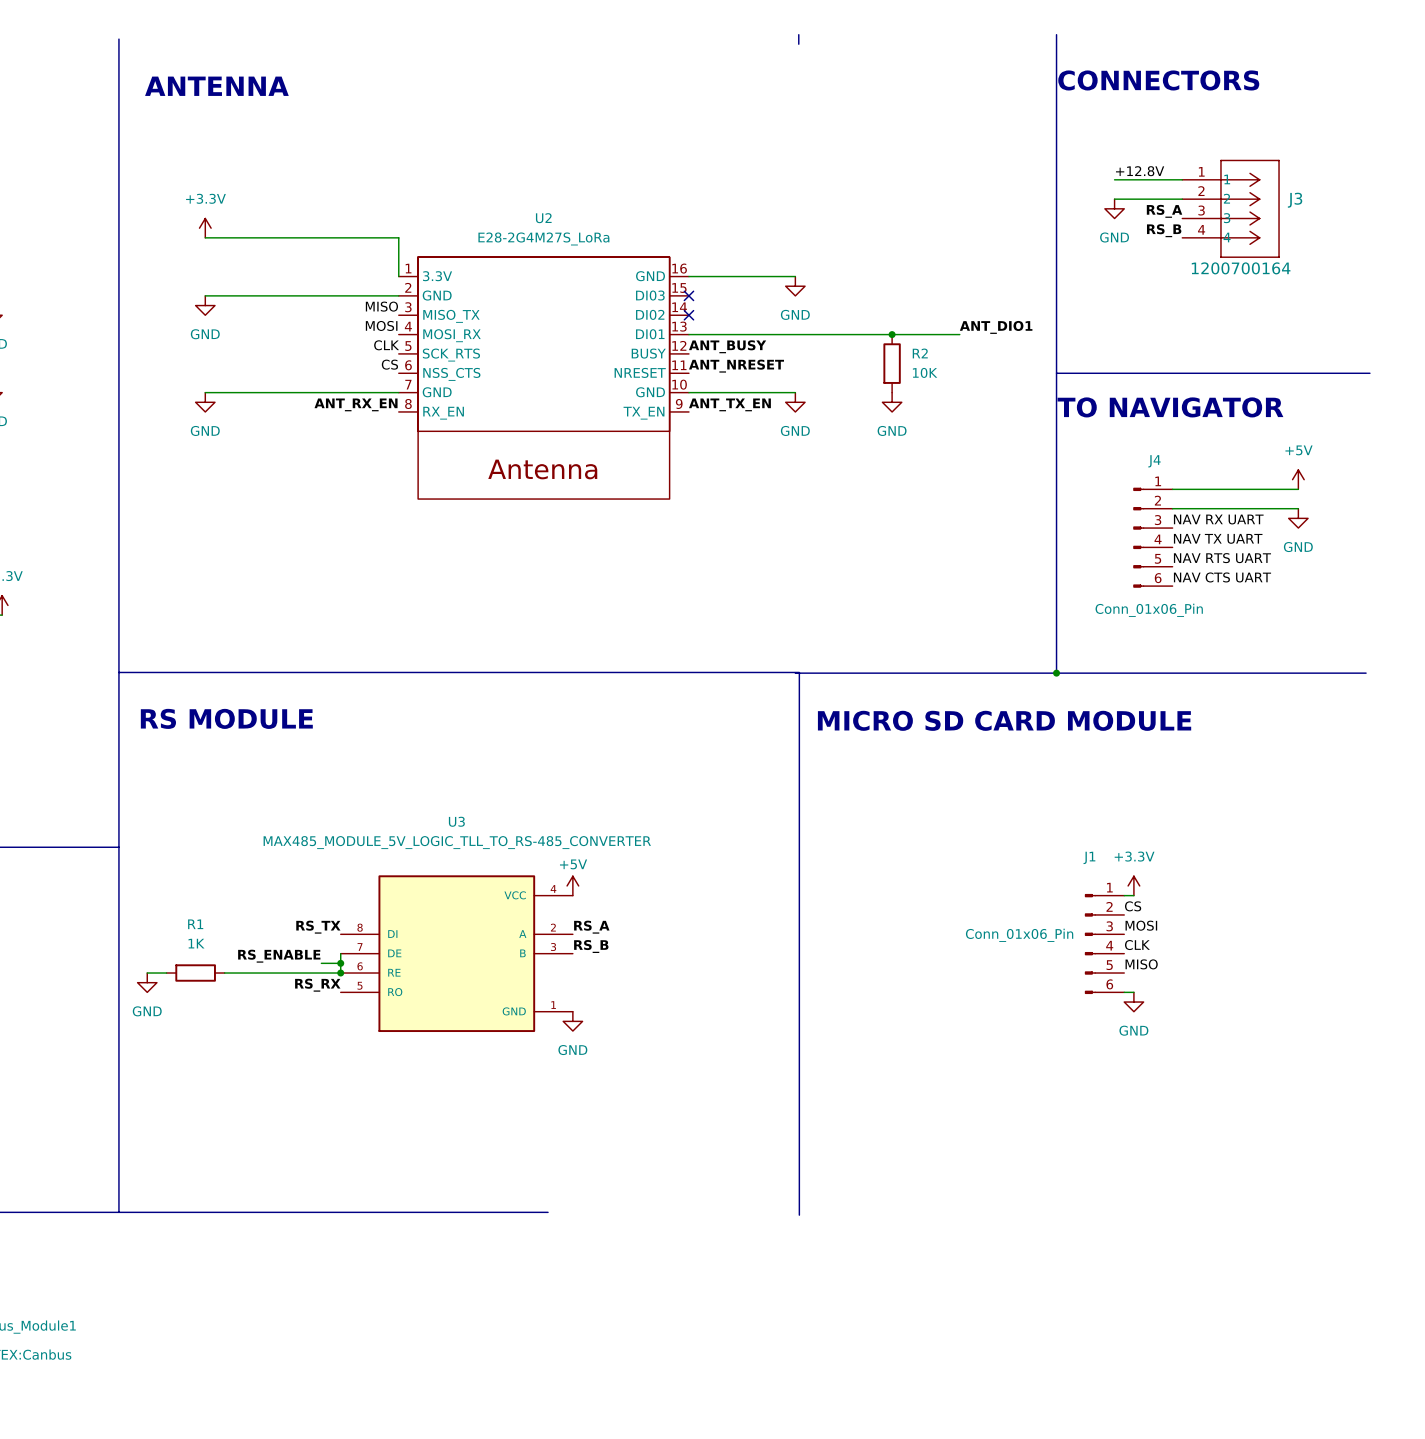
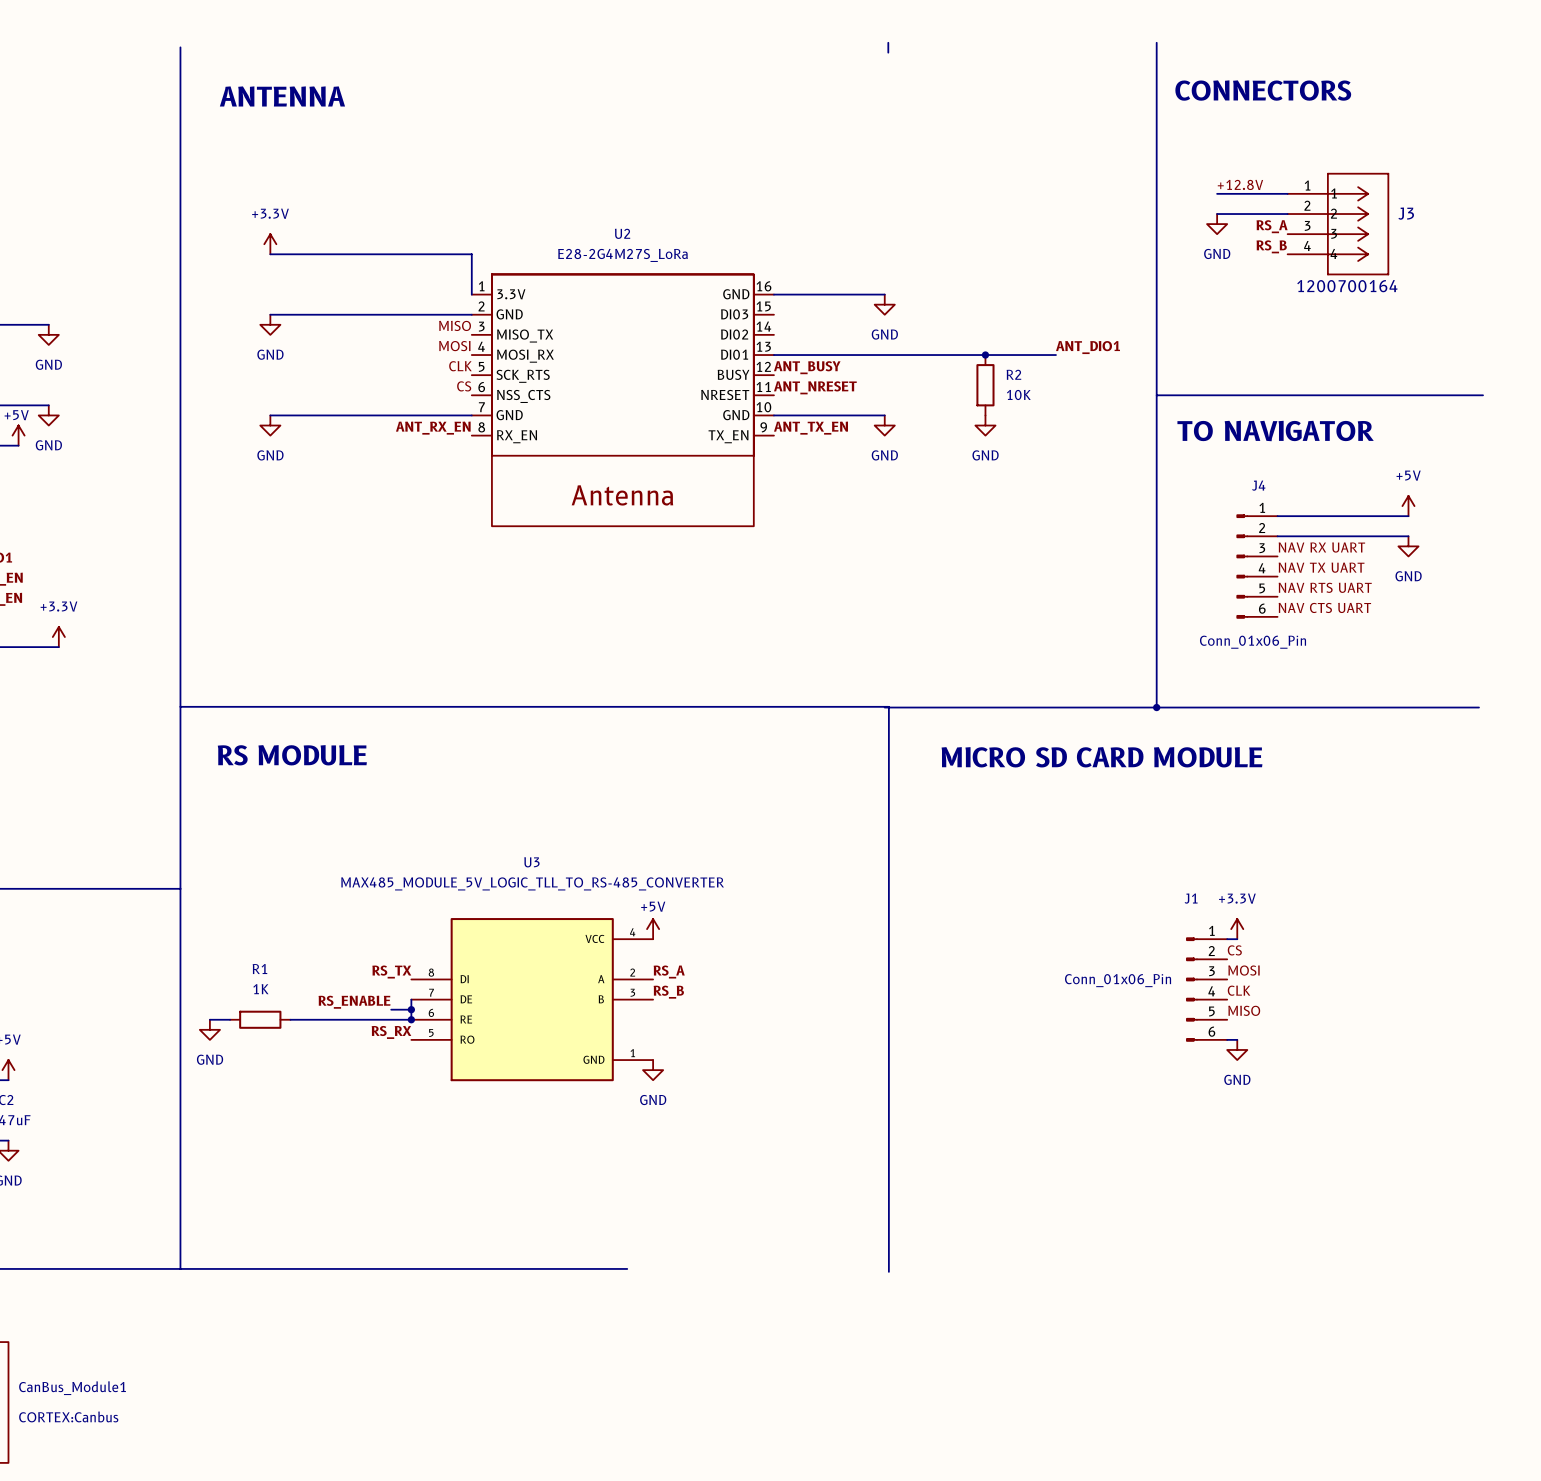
no-connect mark: (688, 295) -> none
no-connect mark: (688, 315) -> none

